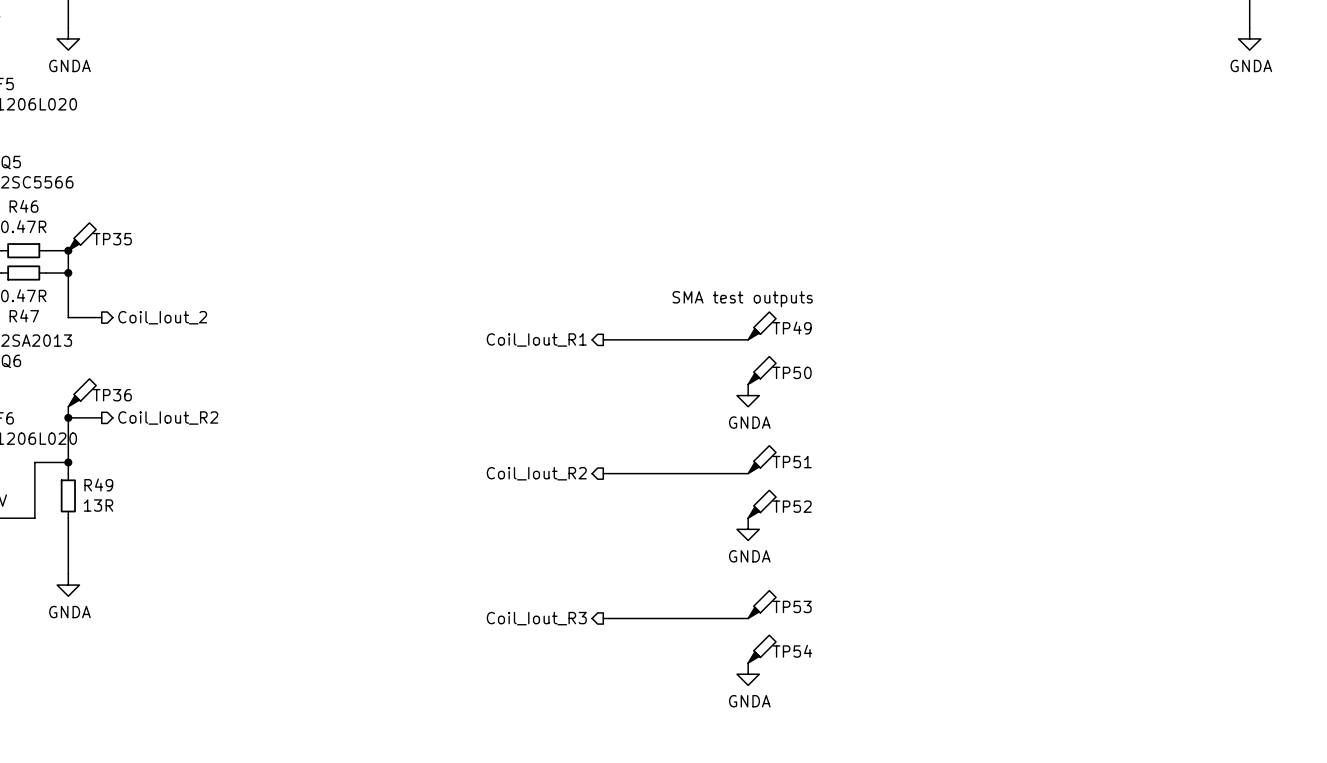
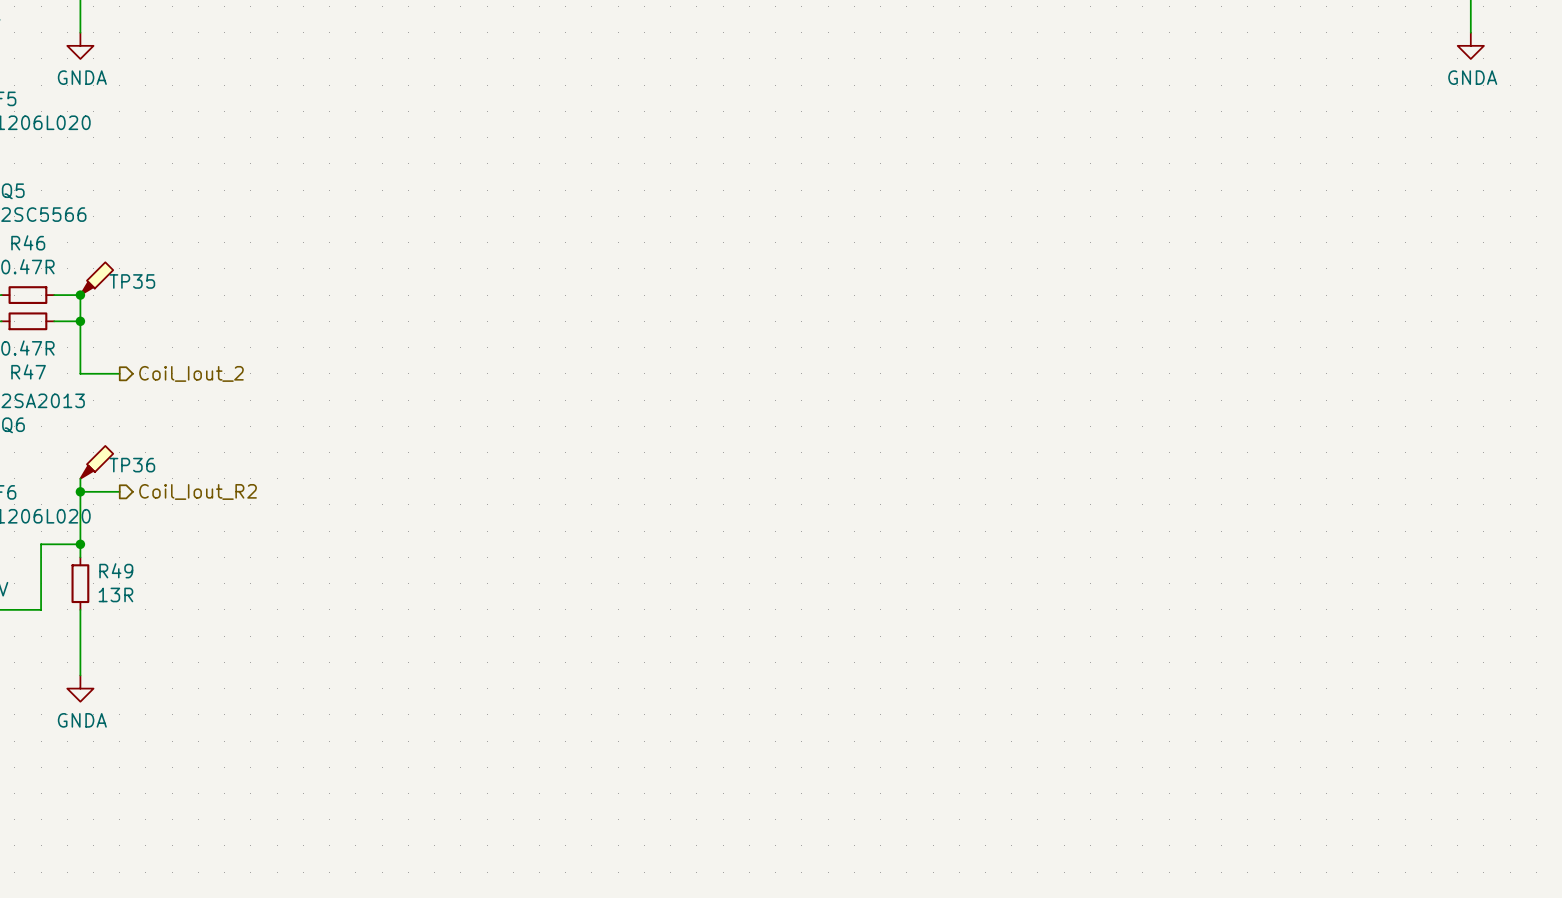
text: SMA test outputs (742, 299) -> none
TP49: (762, 325) -> none
hierarchical label: Coil_Iout_R1 (536, 339) -> none
wire: (603, 339) (748, 339) -> none
TP50: (762, 370) -> none
power symbol: GNDA (748, 395) -> none
TP51: (762, 459) -> none
hierarchical label: Coil_Iout_R2 (536, 473) -> none
wire: (603, 473) (748, 473) -> none
TP52: (762, 504) -> none
power symbol: GNDA (748, 529) -> none
TP53: (762, 604) -> none
hierarchical label: Coil_Iout_R3 (536, 618) -> none
wire: (603, 618) (748, 618) -> none
TP54: (762, 649) -> none
power symbol: GNDA (748, 674) -> none

